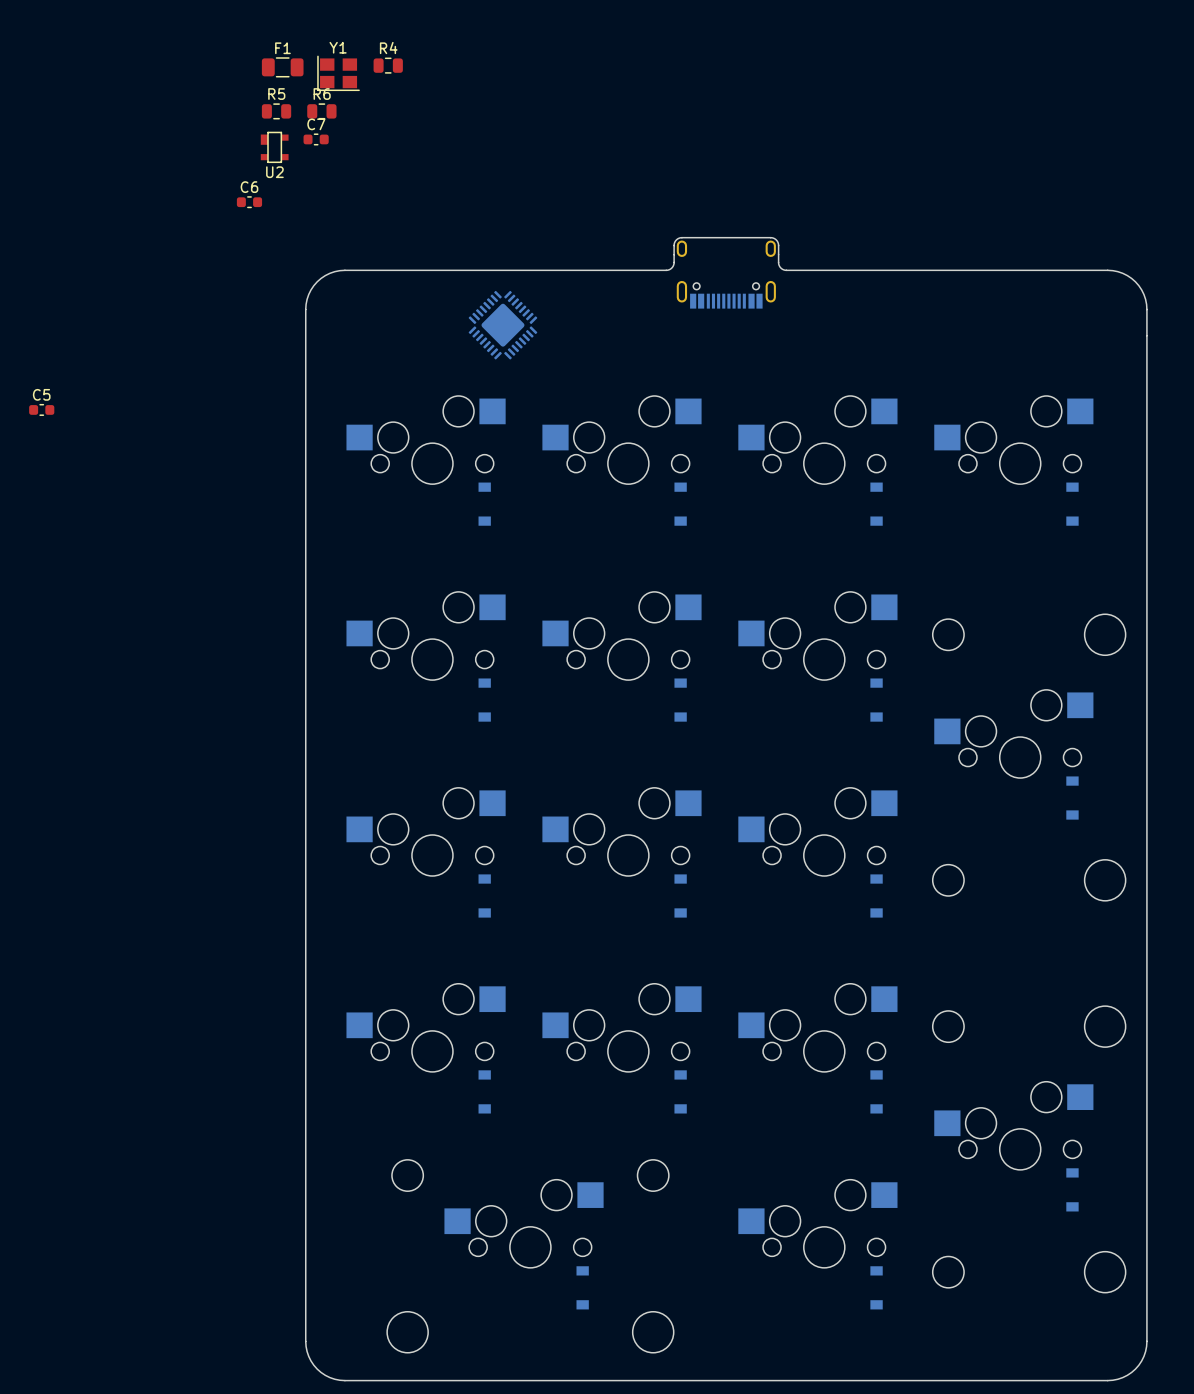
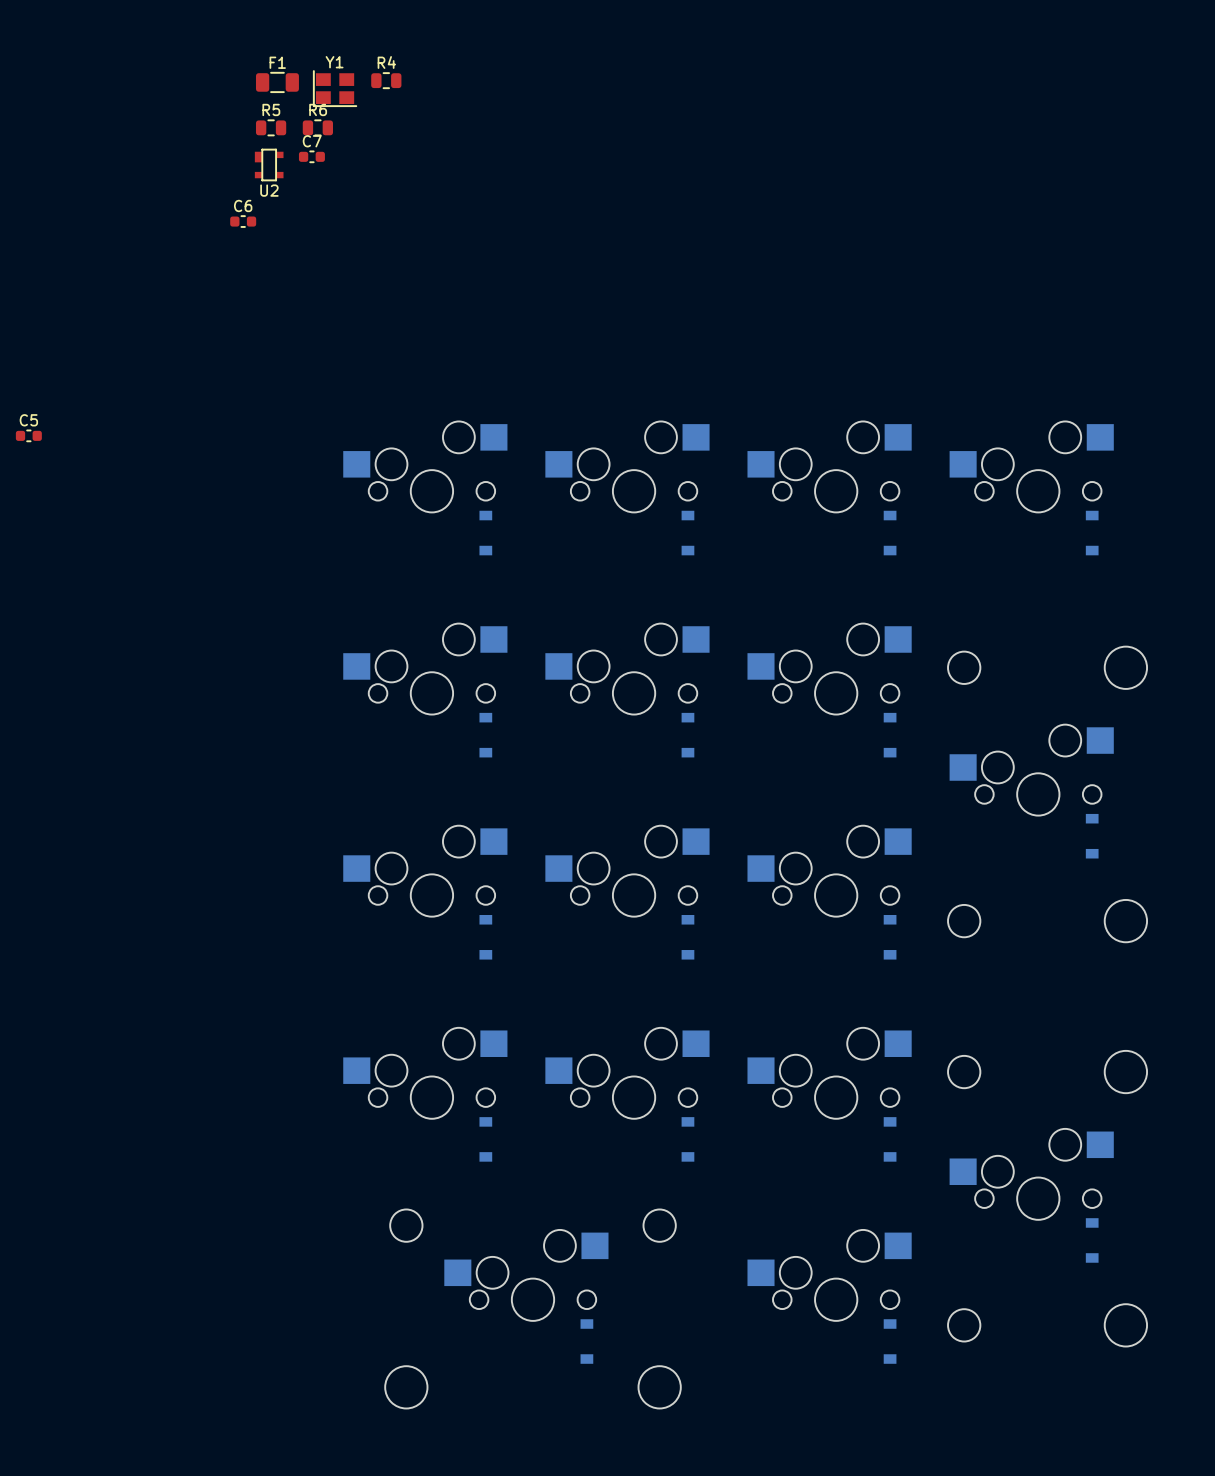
board edge: (681, 237) (772, 237) (778, 243) (779, 265) (785, 270) (1112, 270) (1131, 278) (1143, 294) (1146, 309) (1146, 1341) (1141, 1360) (1135, 1369) (1122, 1377) (1107, 1380) (344, 1380) (325, 1375) (317, 1369) (308, 1356) (305, 1341) (307, 299) (311, 289) (321, 278) (339, 270) (667, 270) (673, 264) (674, 242) (681, 237) -> none
part: (726, 274) -> none
part: (502, 325) -> none

